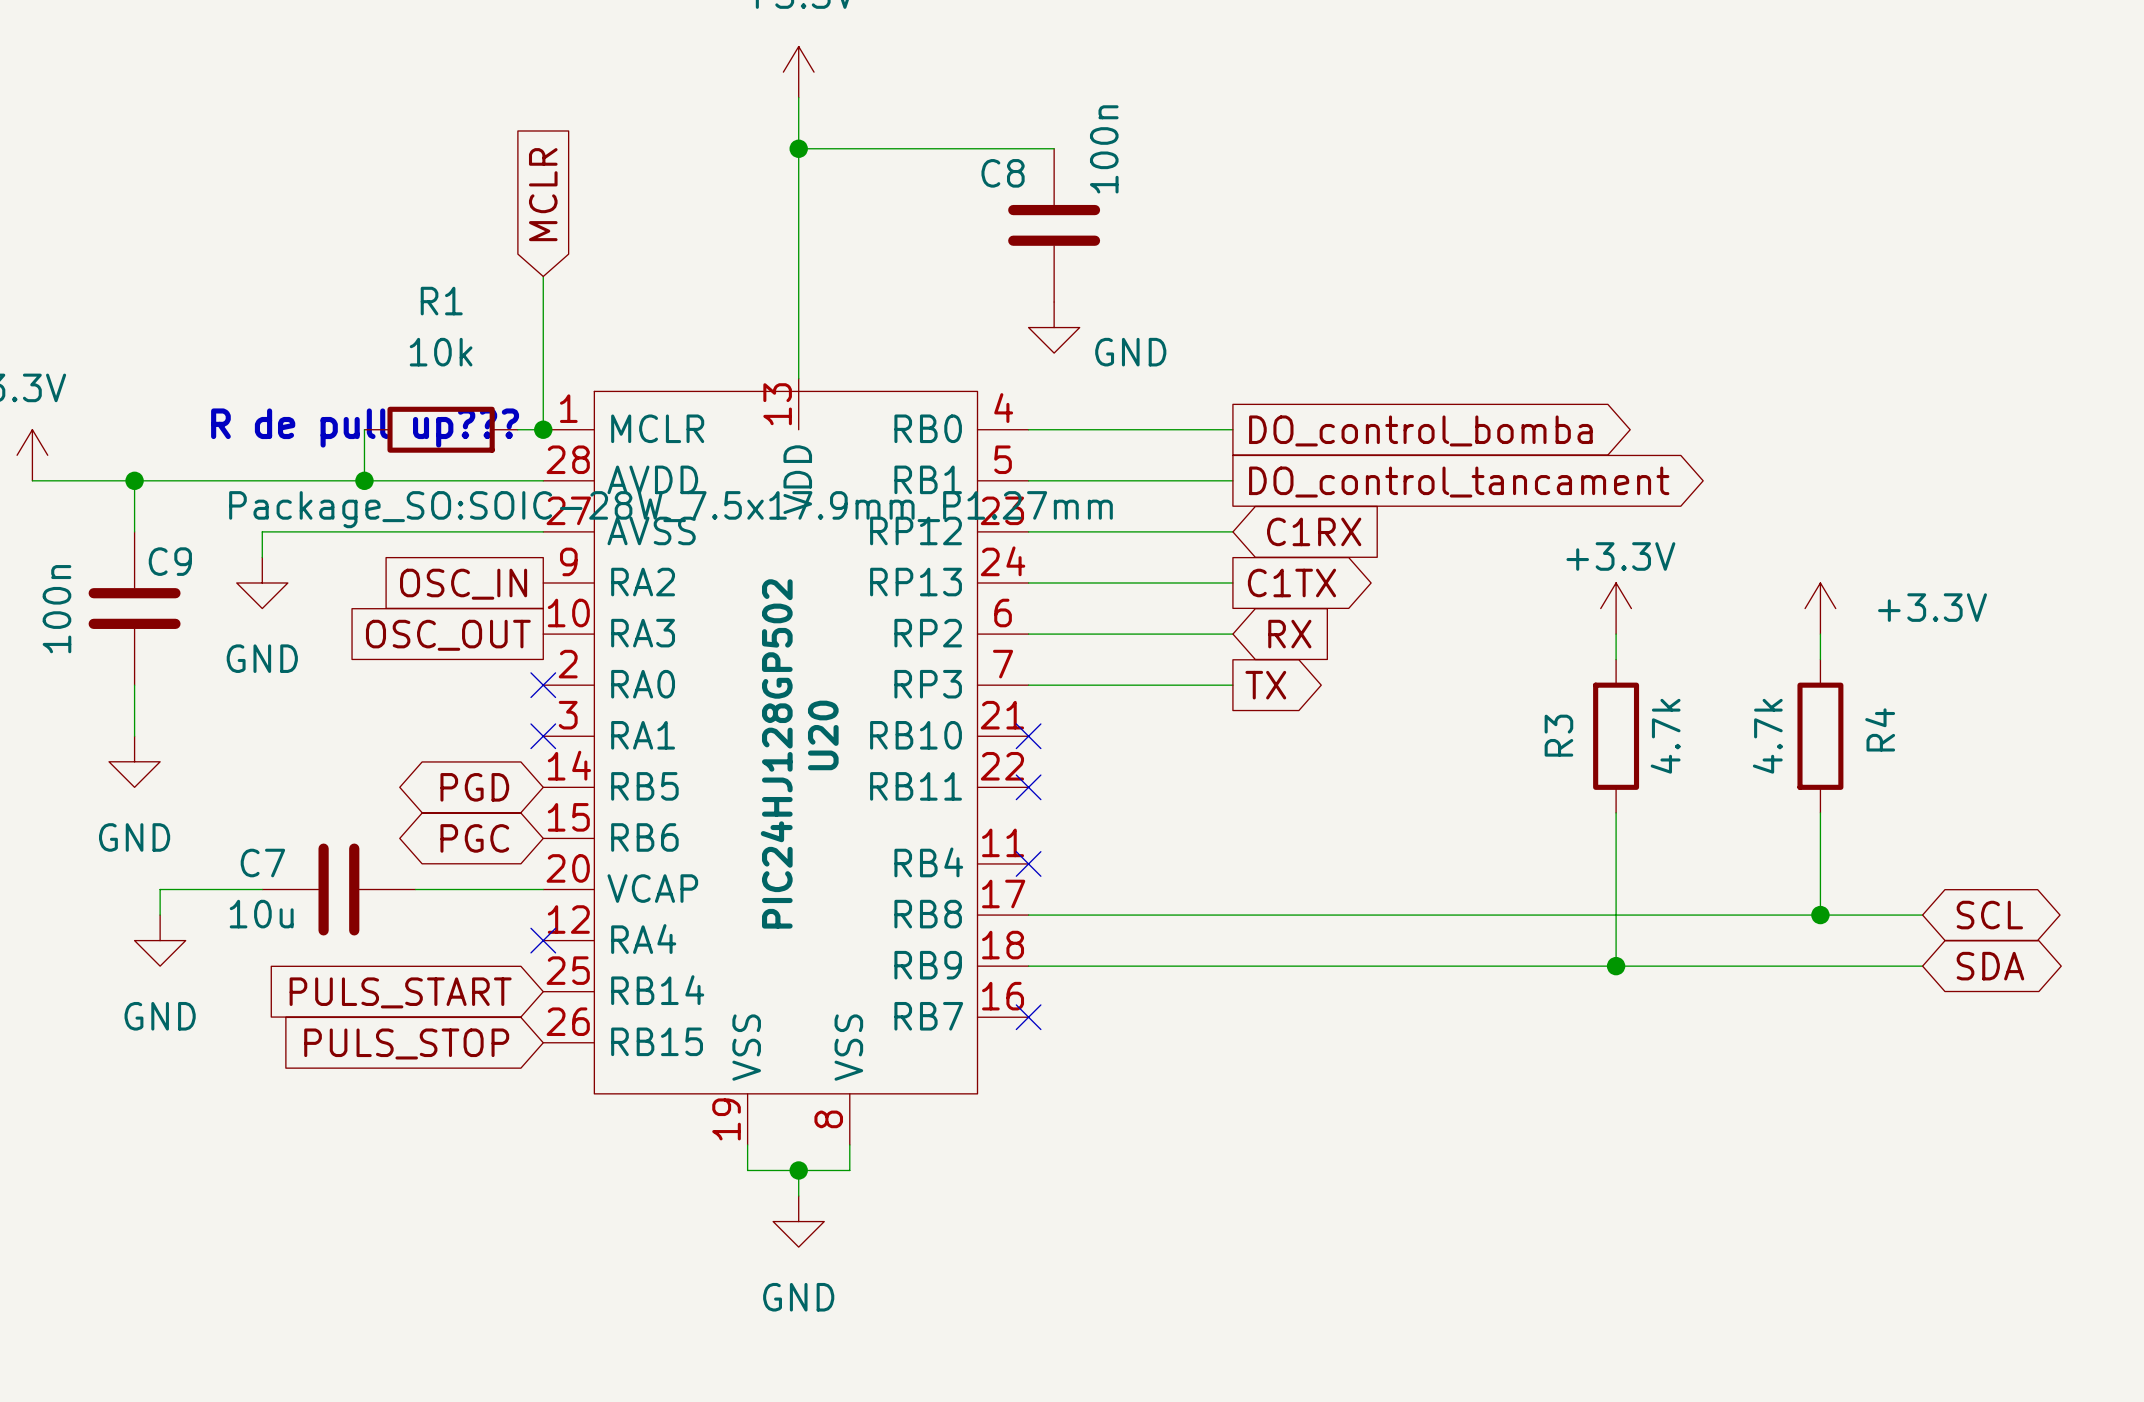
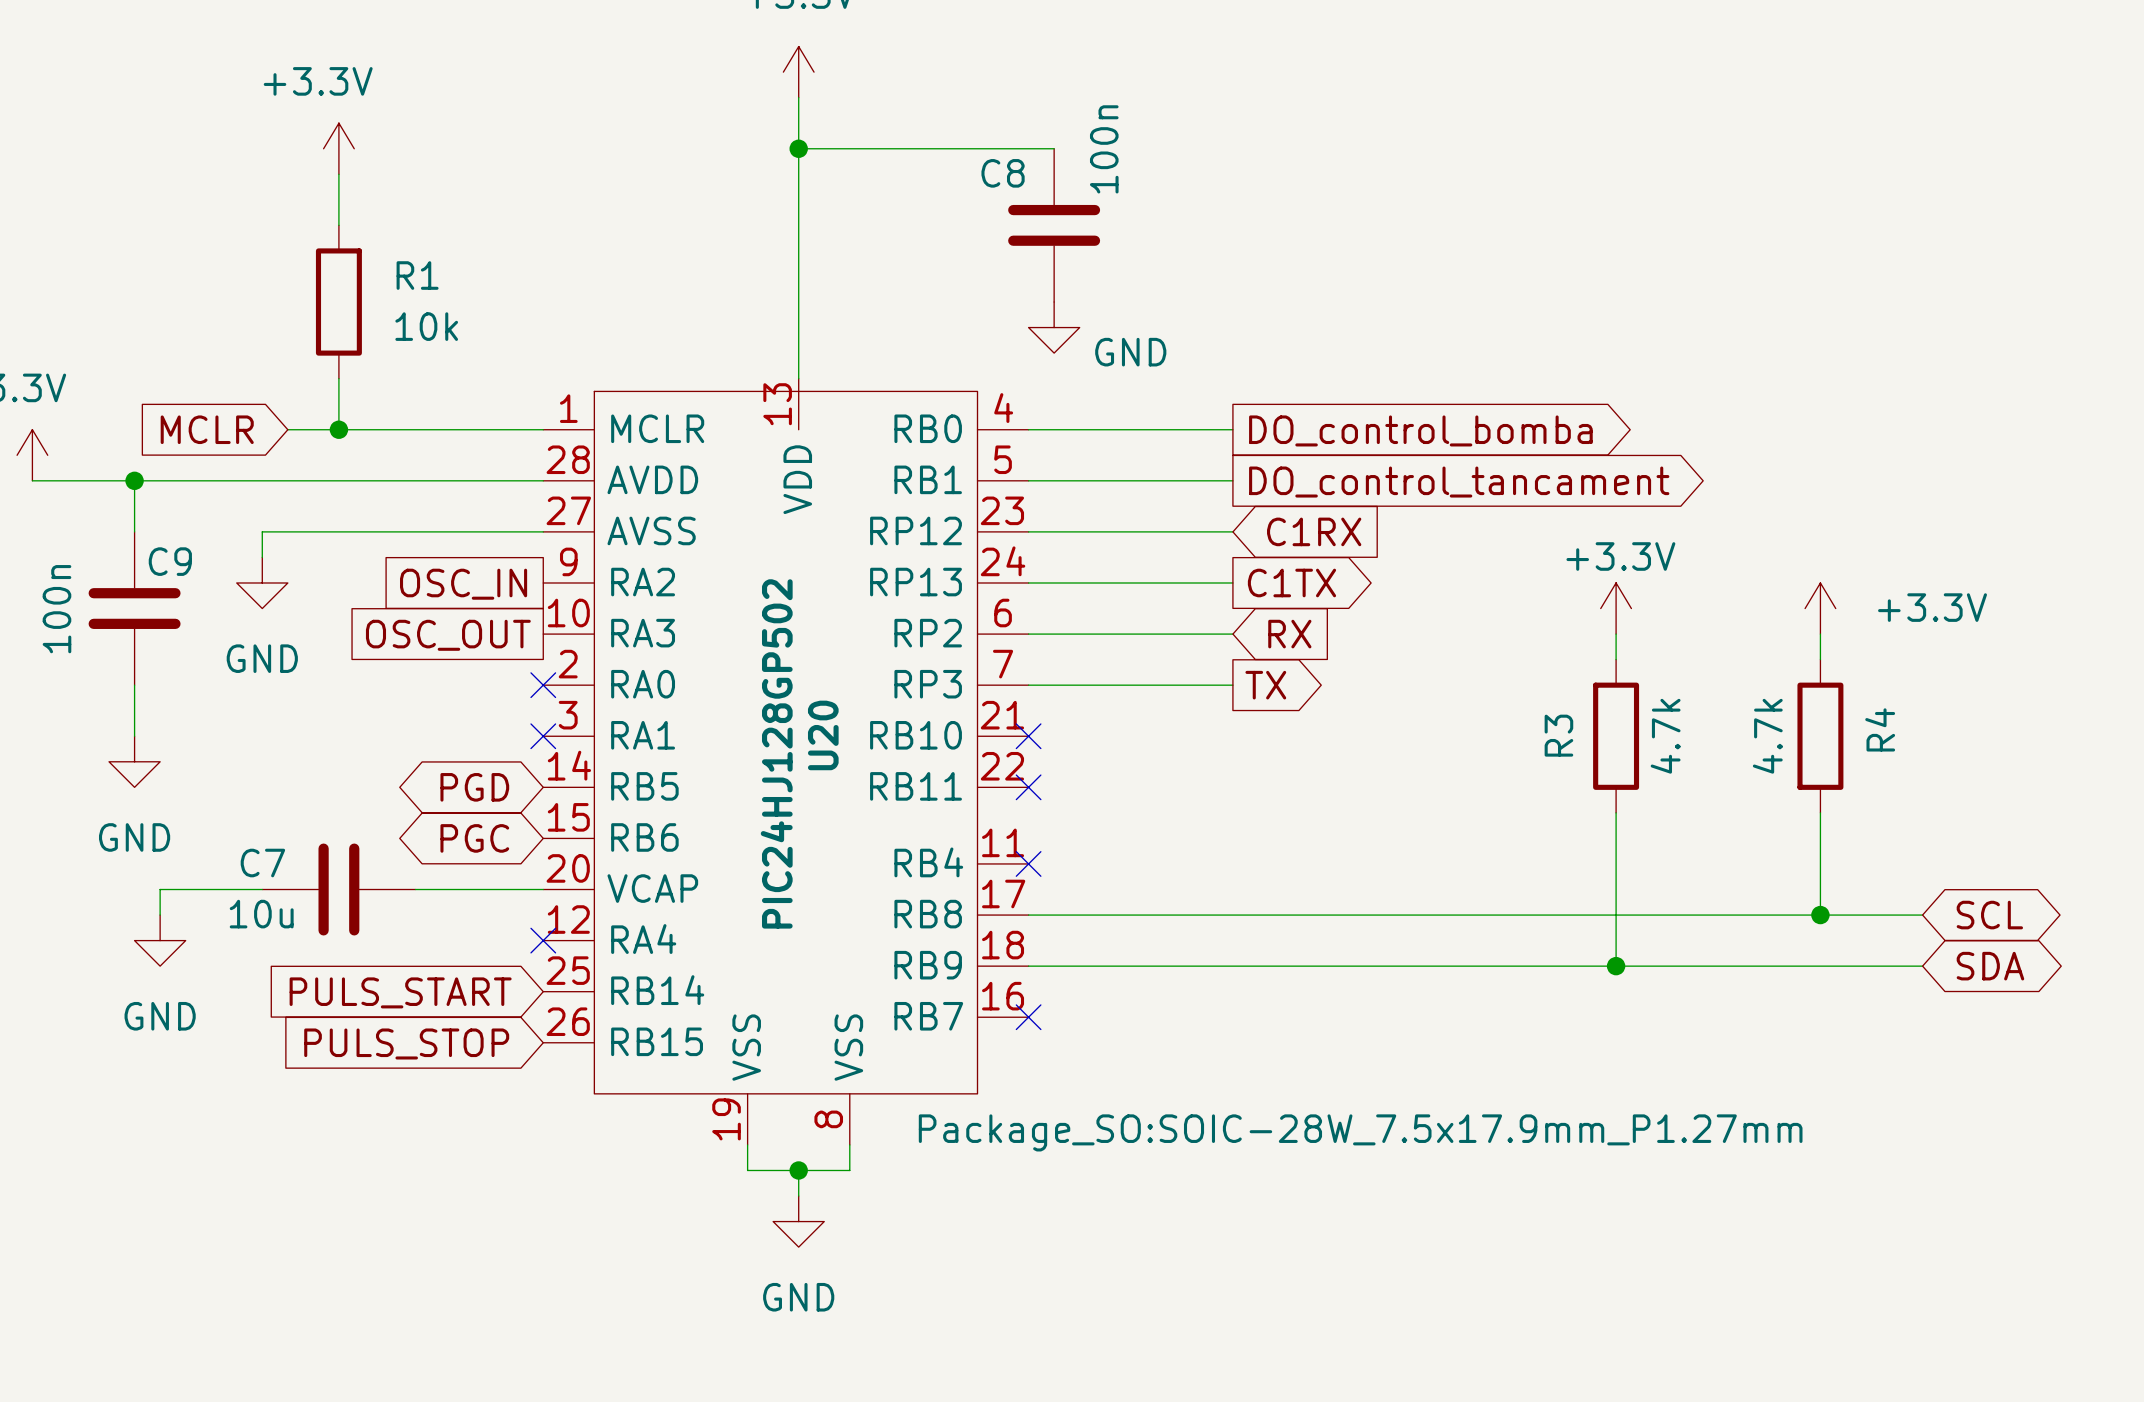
power symbol: none -> +3.3V (338, 148)
wire: none -> (338, 174) (338, 225)
global label rotation: 0° (543, 194) -> 90° counterclockwise (207, 429)
global label position: MCLR (543, 194) -> MCLR (207, 429)
wire: (543, 276) (543, 429) -> none
R1 name position: R1 (441, 301) -> R1 (417, 275)
text: R de pull up??? (365, 428) -> none
wire: none -> (287, 429) (517, 429)
wire: (364, 429) (364, 480) -> (338, 378) (338, 429)
R1 rotation: 0° (441, 429) -> 90° clockwise (338, 302)
R1 position: (441, 429) -> (338, 302)
junction: (543, 429) -> none
junction position: (364, 480) -> (338, 429)
U20 text position: Package_SO:SOIC-28W_7.5x17.9mm_P1.27mm (670, 509) -> Package_SO:SOIC-28W_7.5x17.9mm_P1.27mm (1360, 1132)

